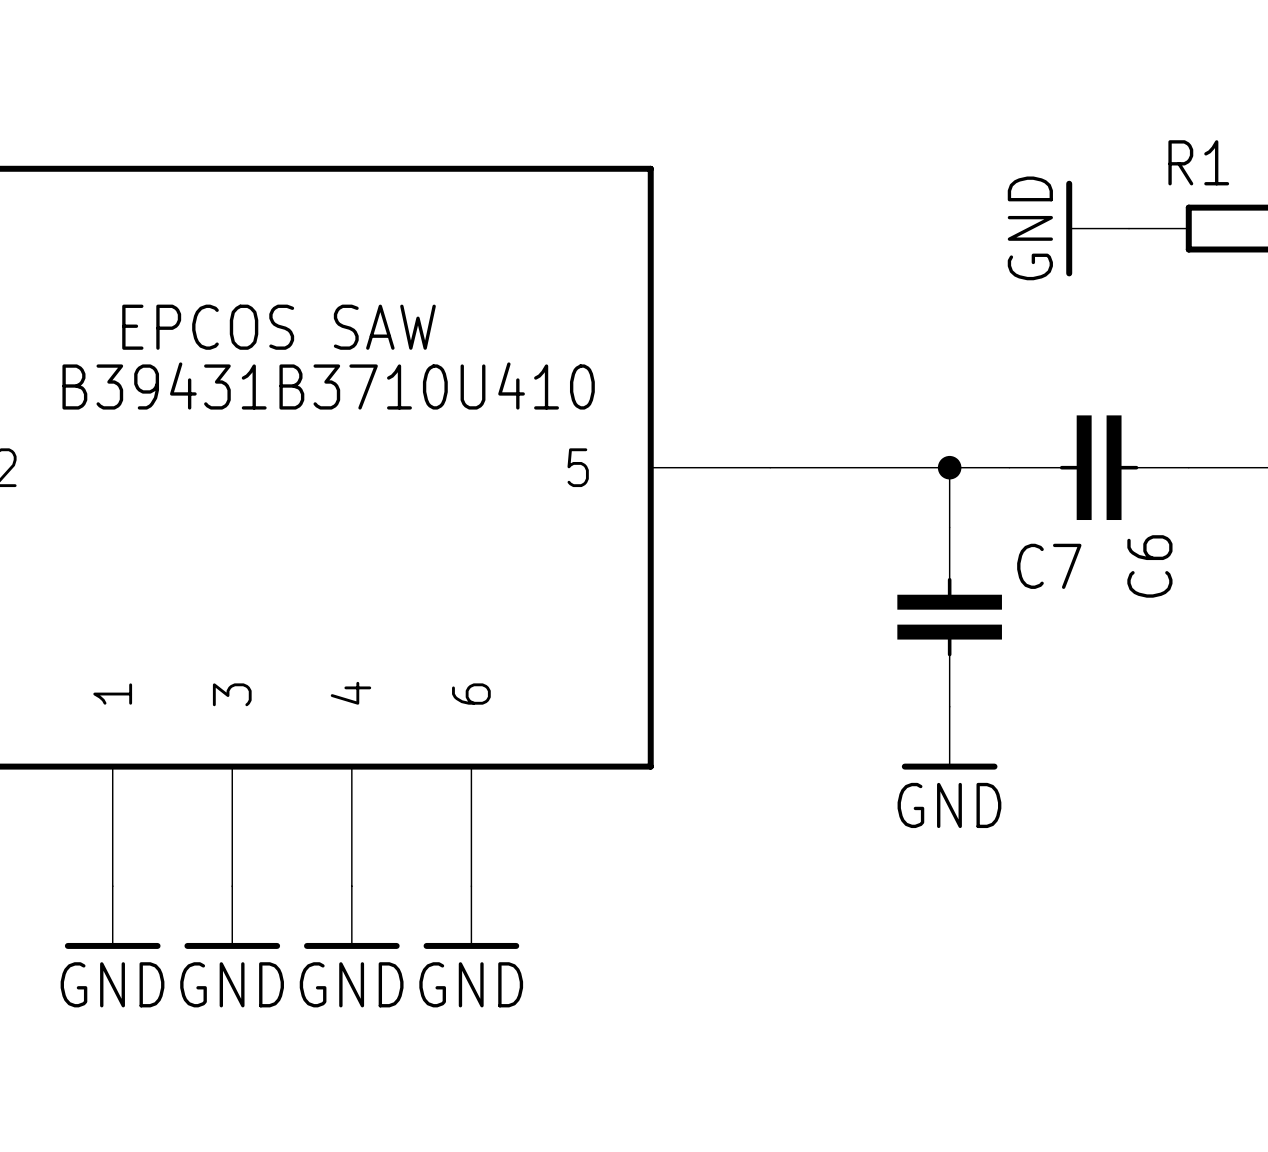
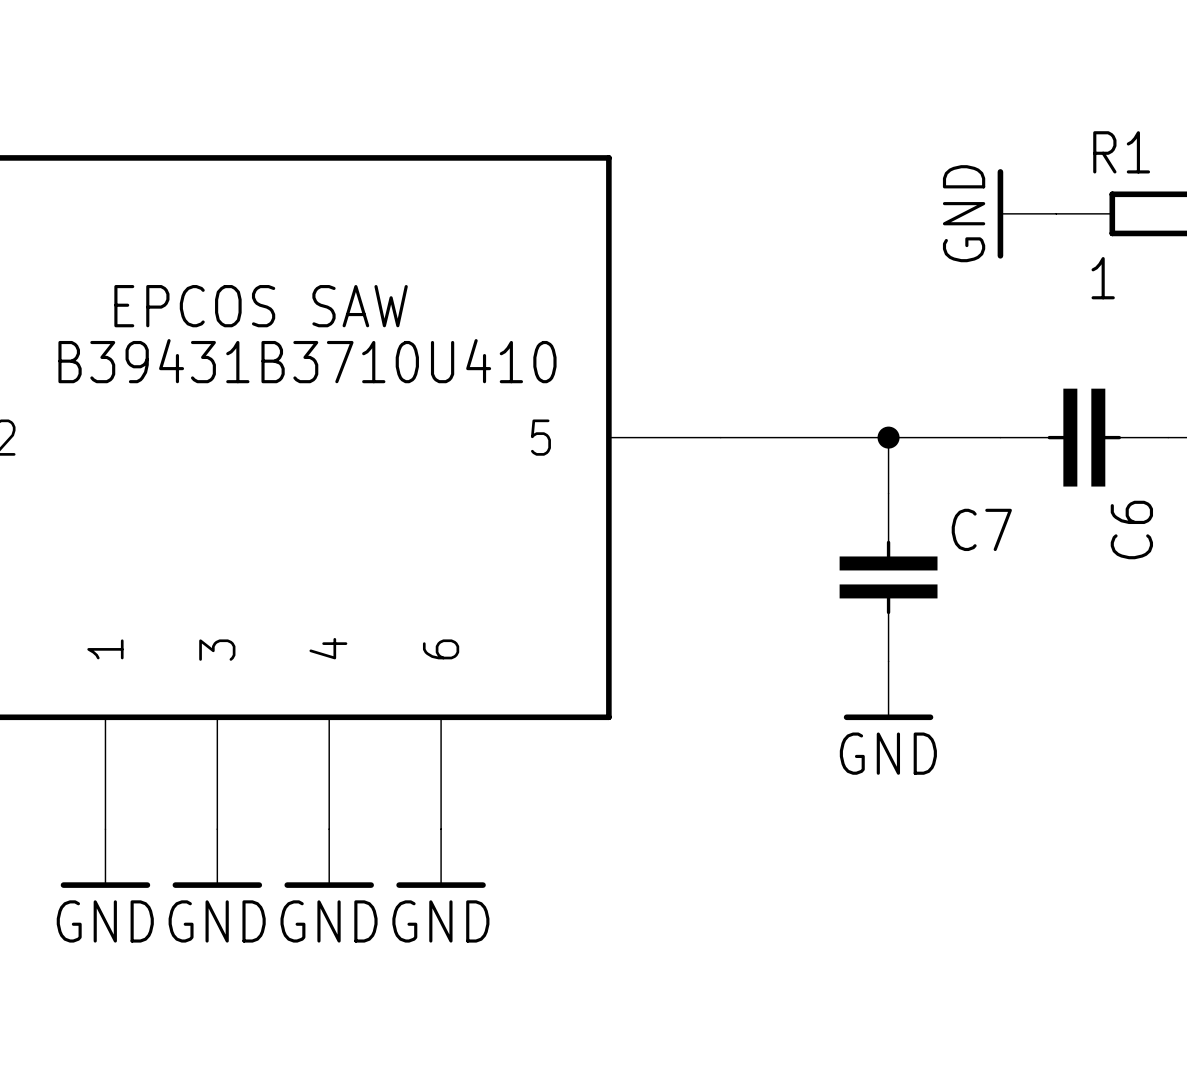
R1 value: none -> 1 (1103, 278)
C6 position: (1099, 467) -> (1084, 437)

